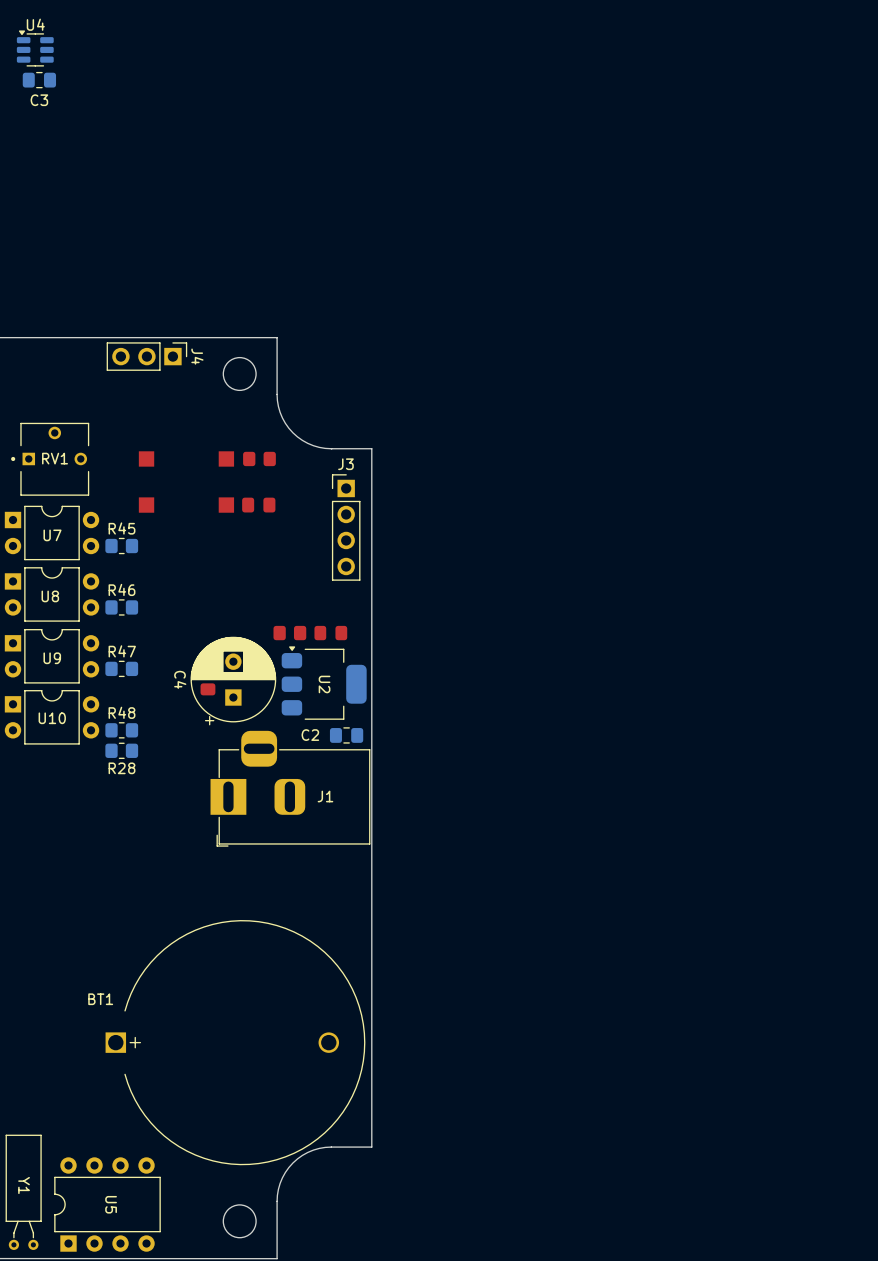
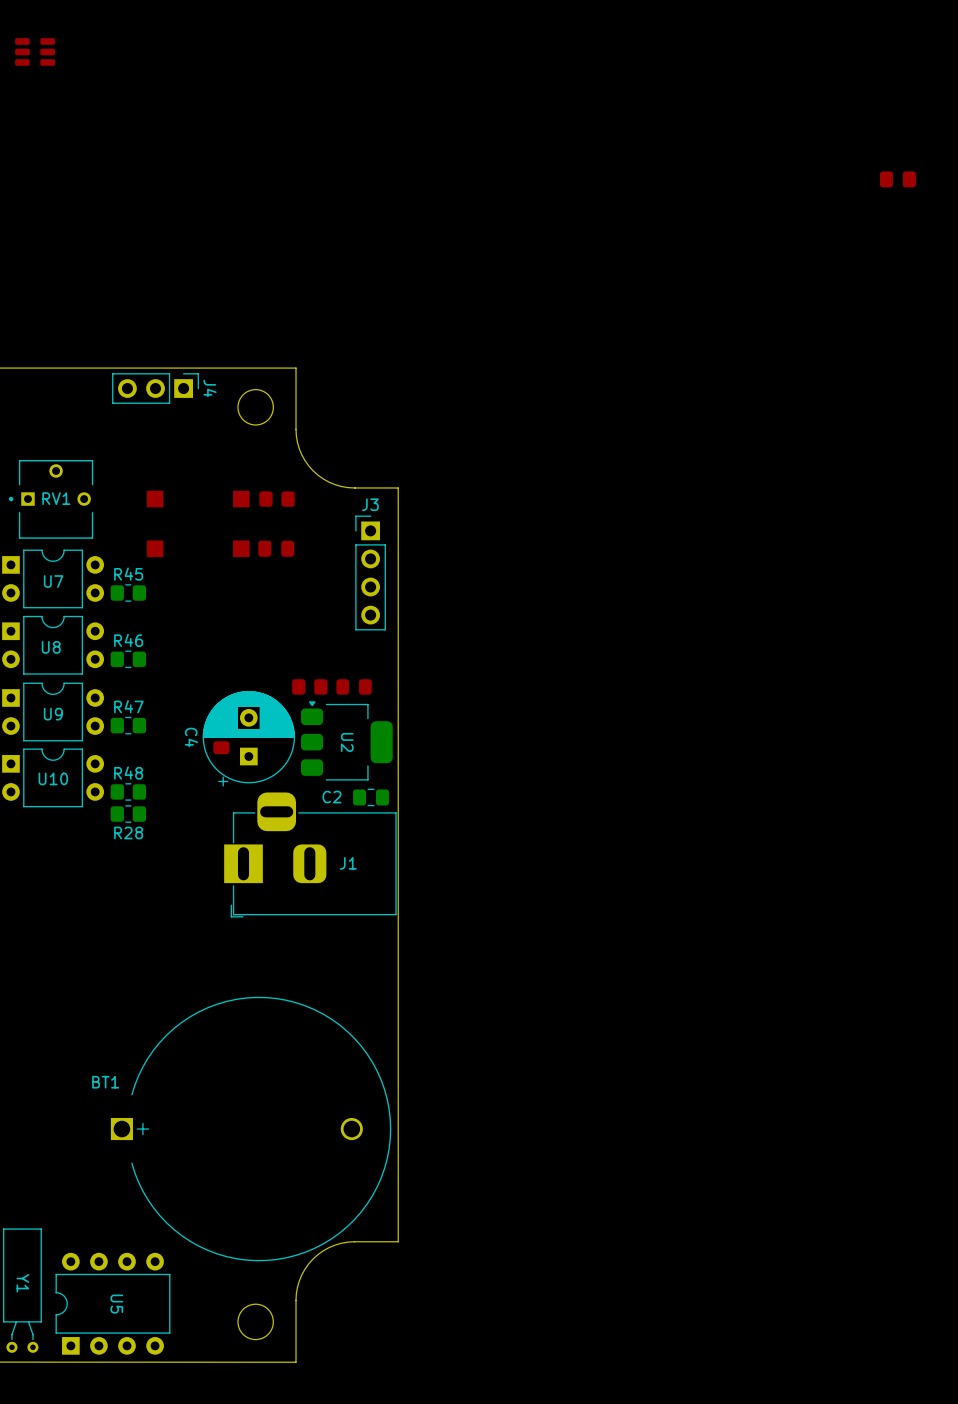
U4 side: bottom (35, 48) -> top (35, 51)
C3: (39, 80) -> none
part: none -> (897, 179)

